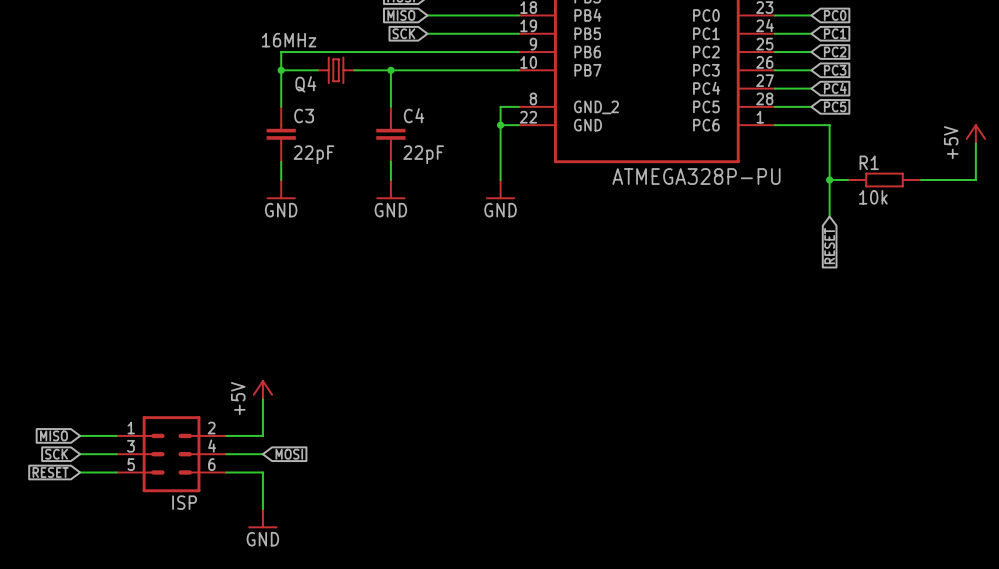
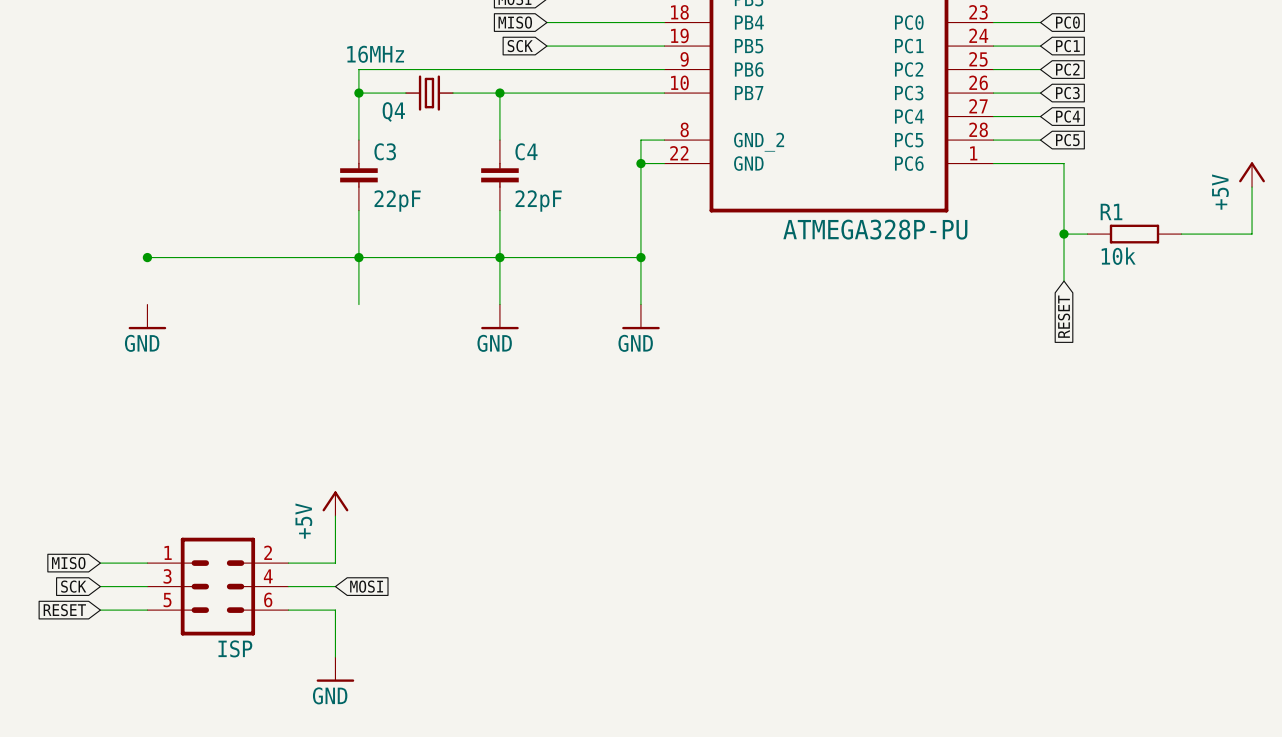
wire: none -> (358, 234) (358, 304)
wire: none -> (499, 234) (499, 304)
wire: none -> (640, 234) (640, 304)
power symbol: GND (281, 189) -> none
power symbol position: GND (390, 189) -> GND (499, 316)
power symbol position: GND (500, 189) -> GND (640, 316)
wire: none -> (147, 257) (640, 257)
junction: none -> (147, 257)
junction: none -> (358, 257)
junction: none -> (499, 257)
junction: none -> (640, 257)
power symbol: none -> GND (147, 316)

